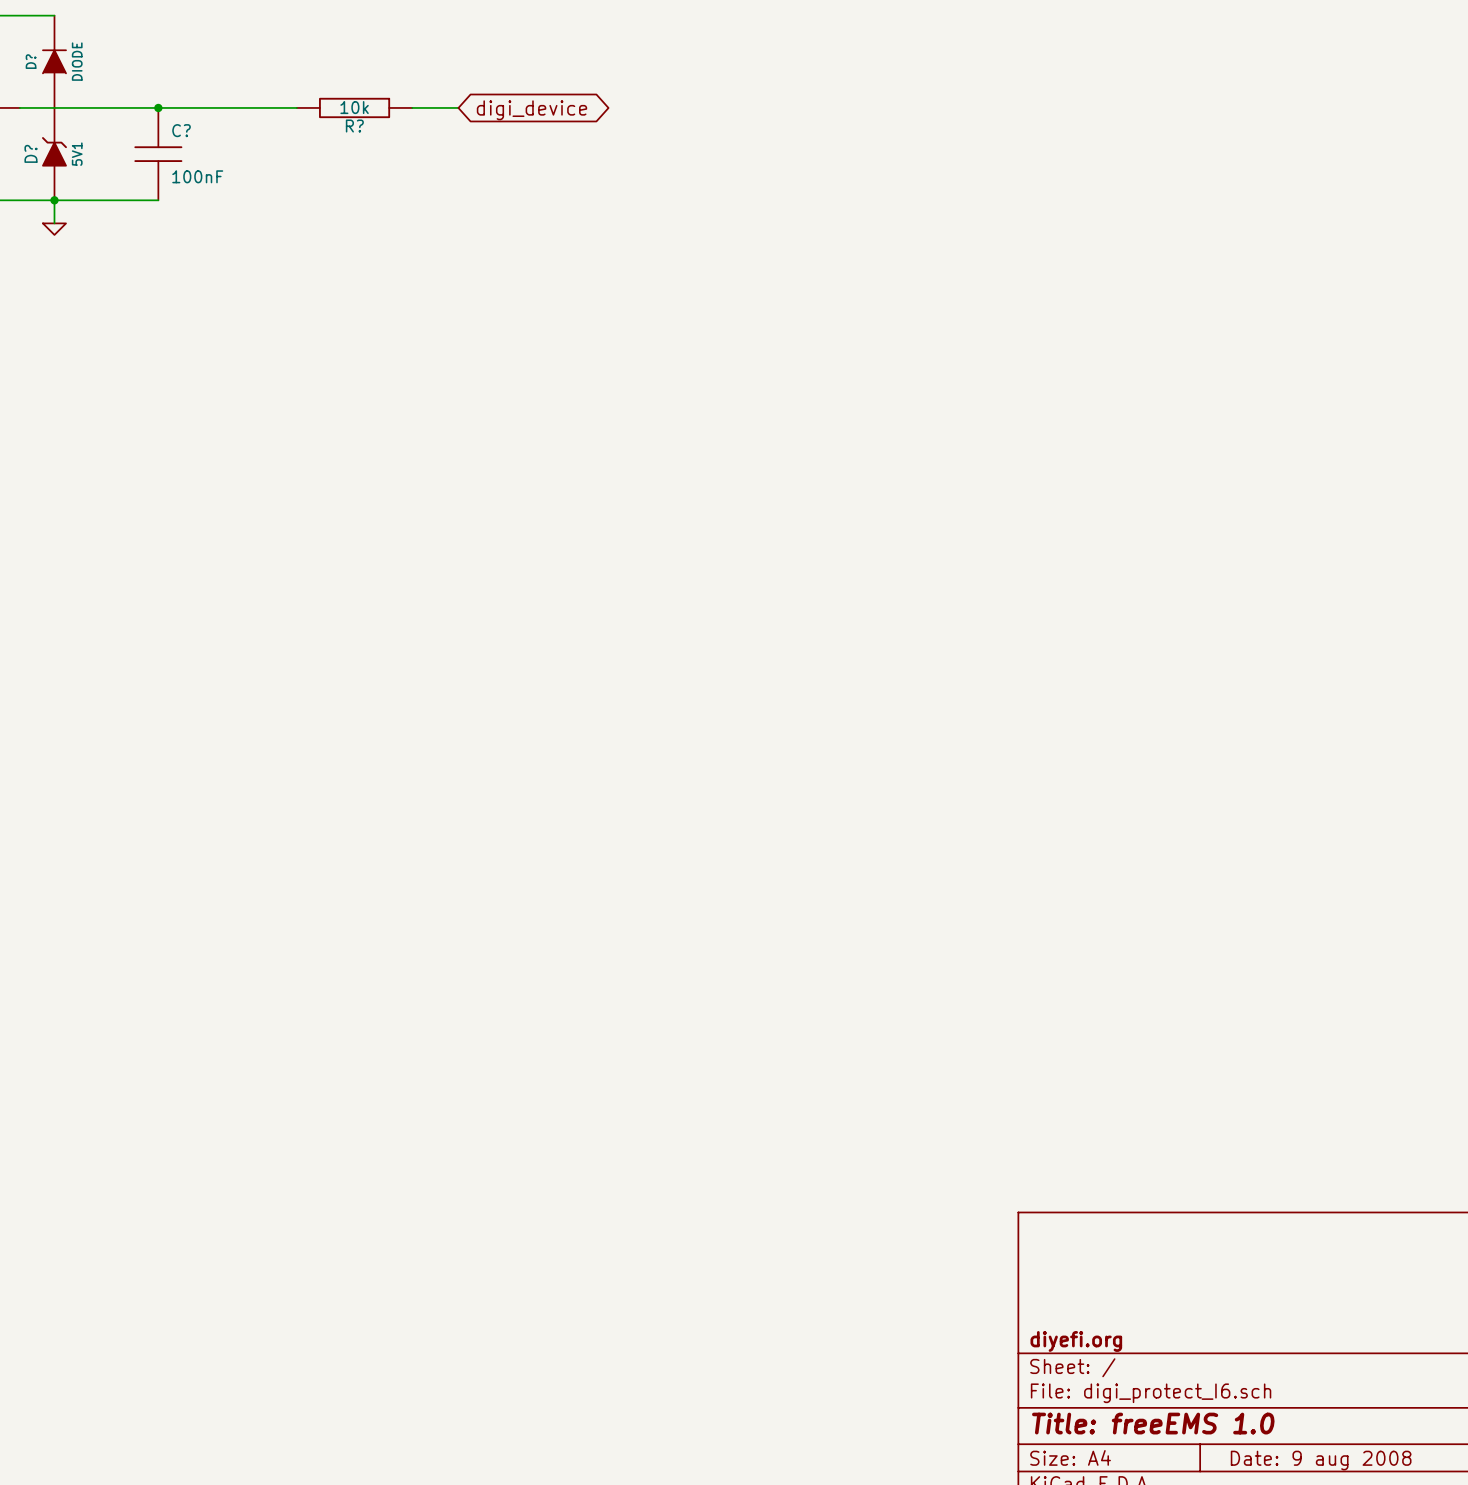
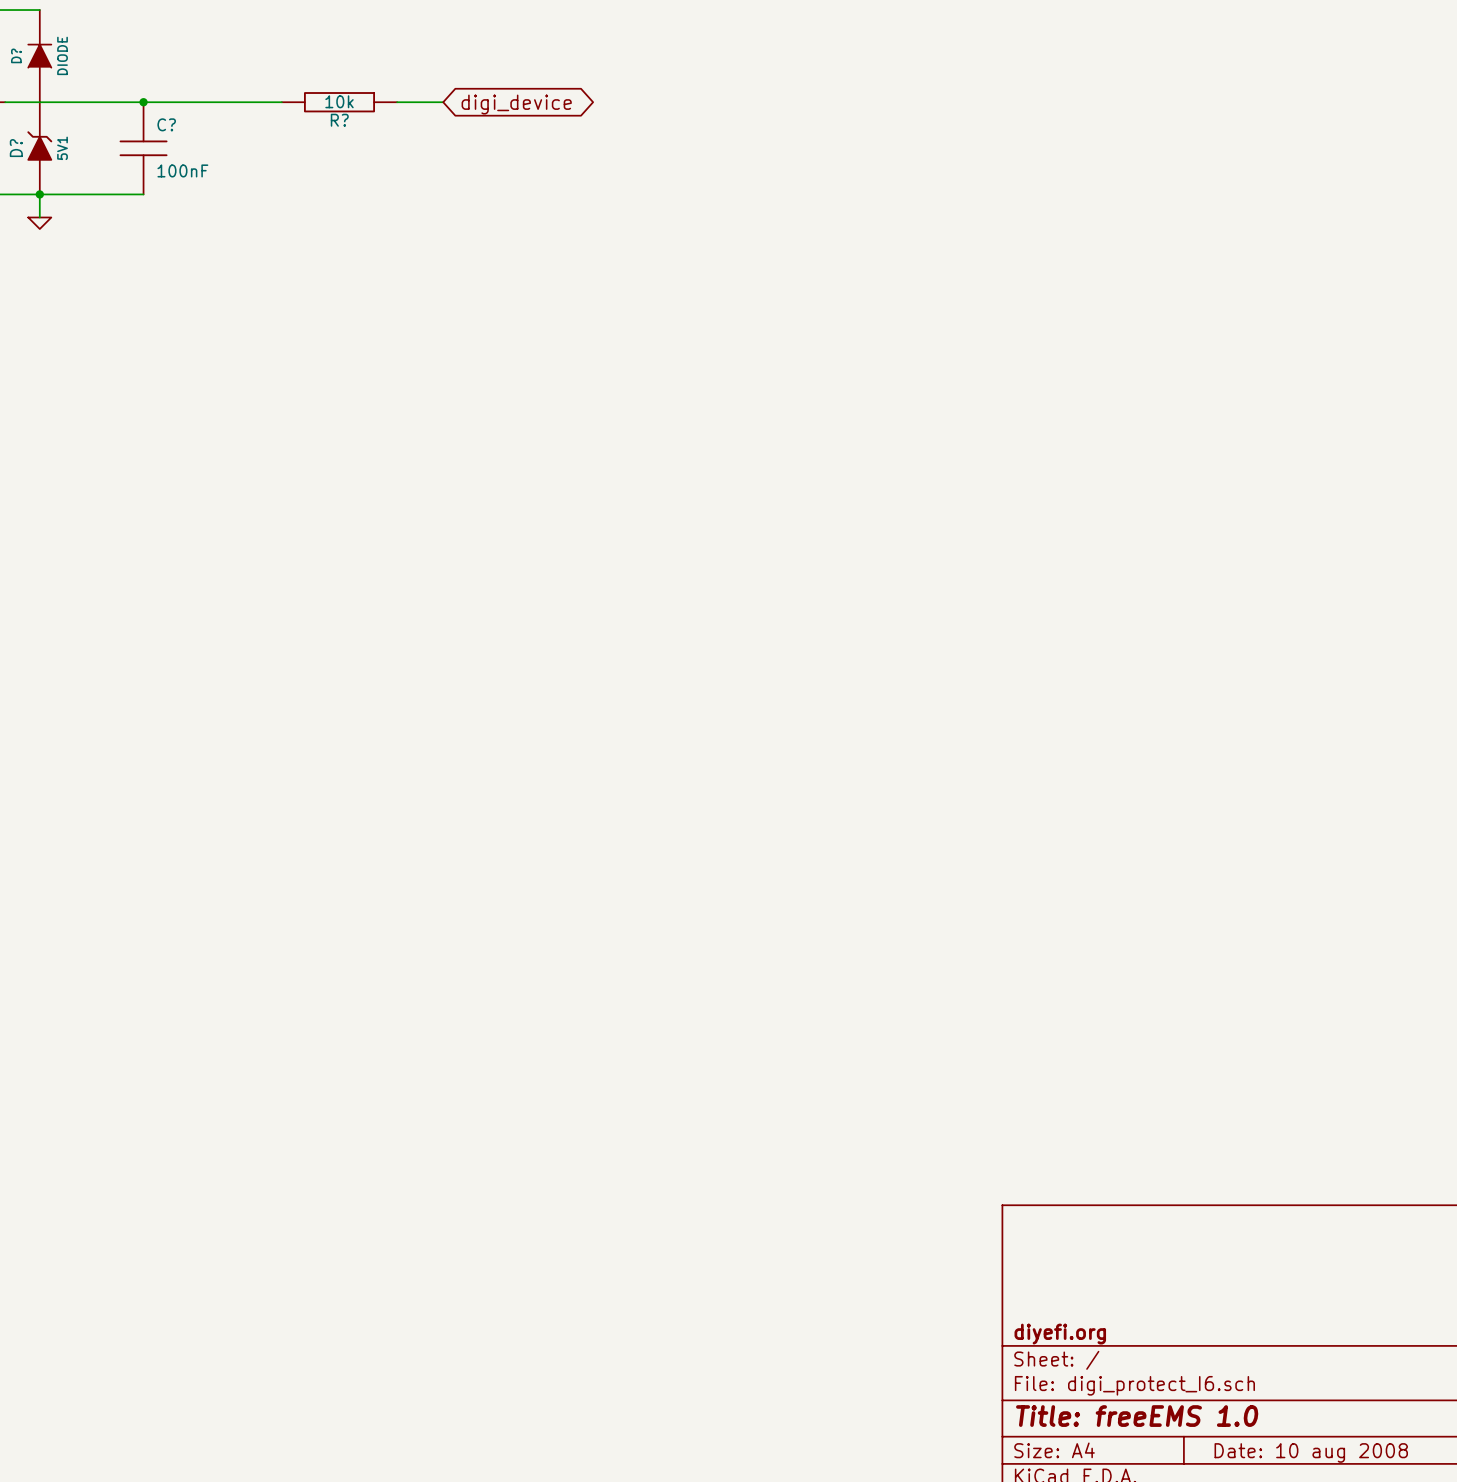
title block: Date: 9 aug 2008 (1321, 1460) -> Date: 10 aug 2008 (1311, 1452)

